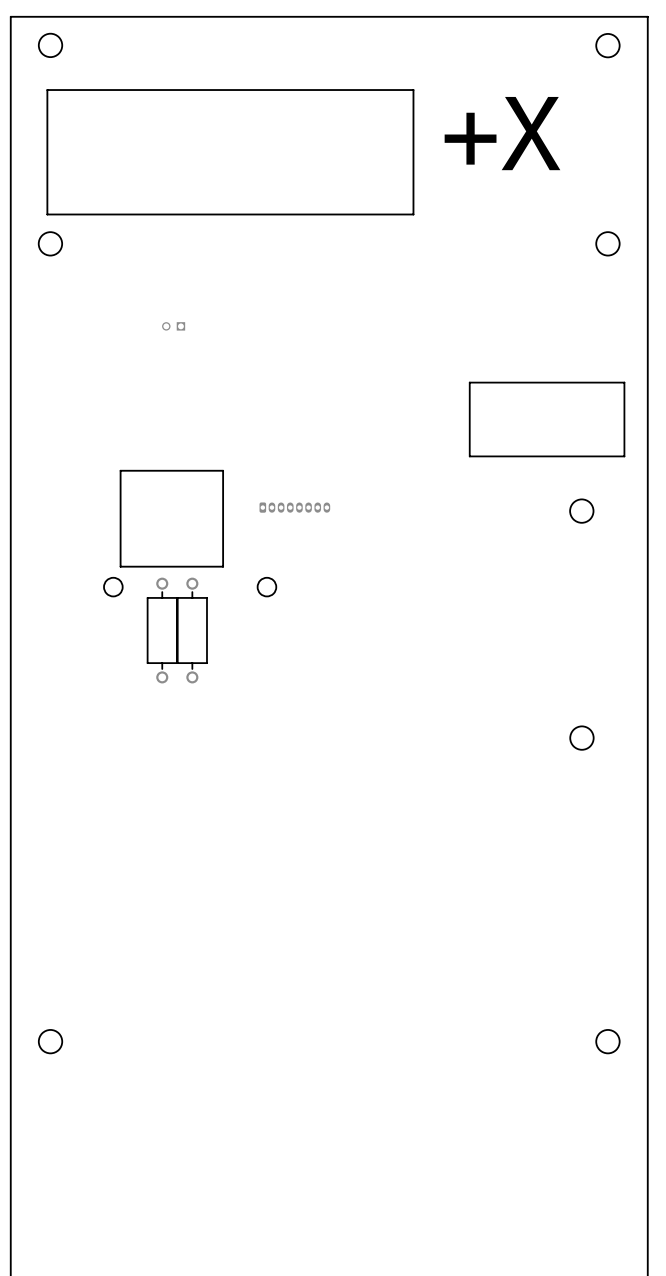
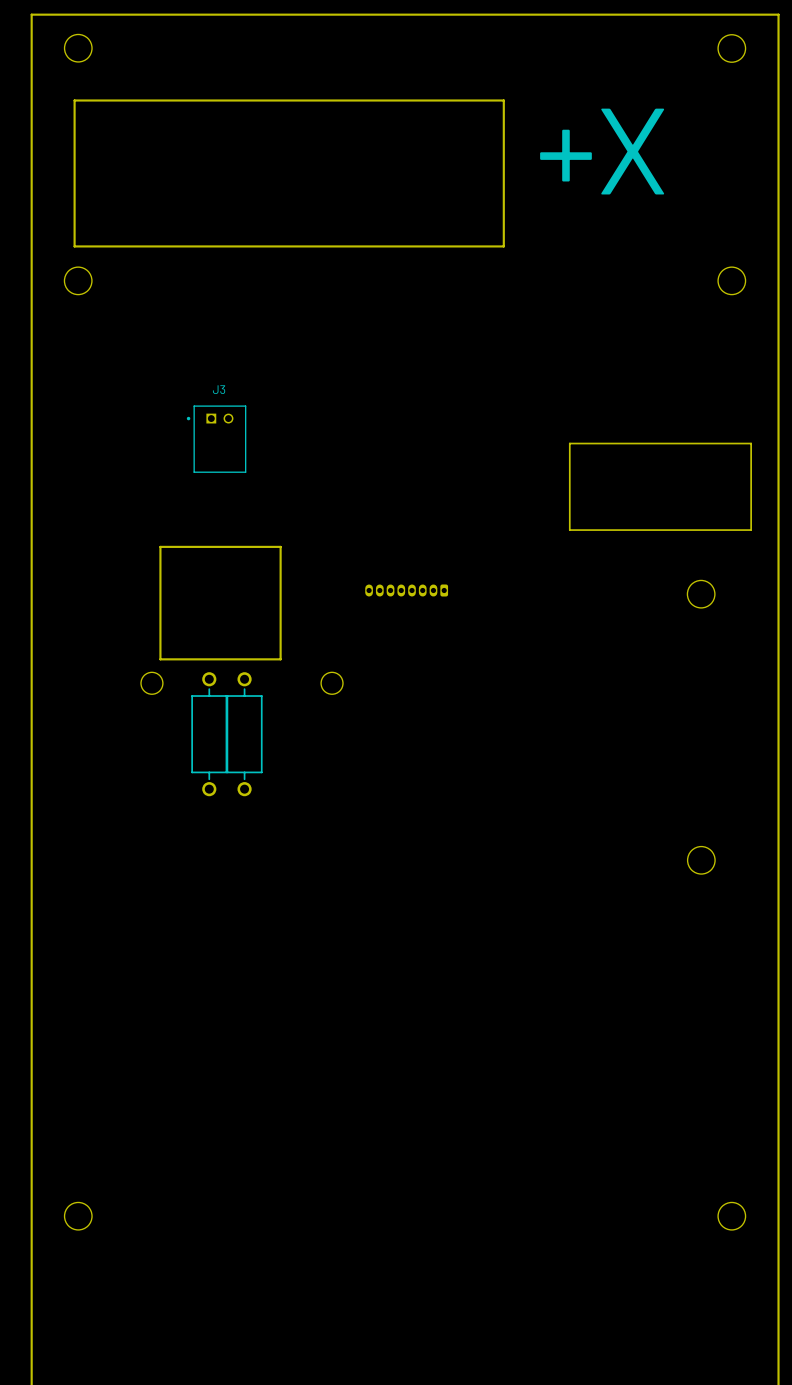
J3 side: bottom (173, 326) -> top (216, 439)
part rotation: 0° (294, 507) -> 180° (406, 590)

